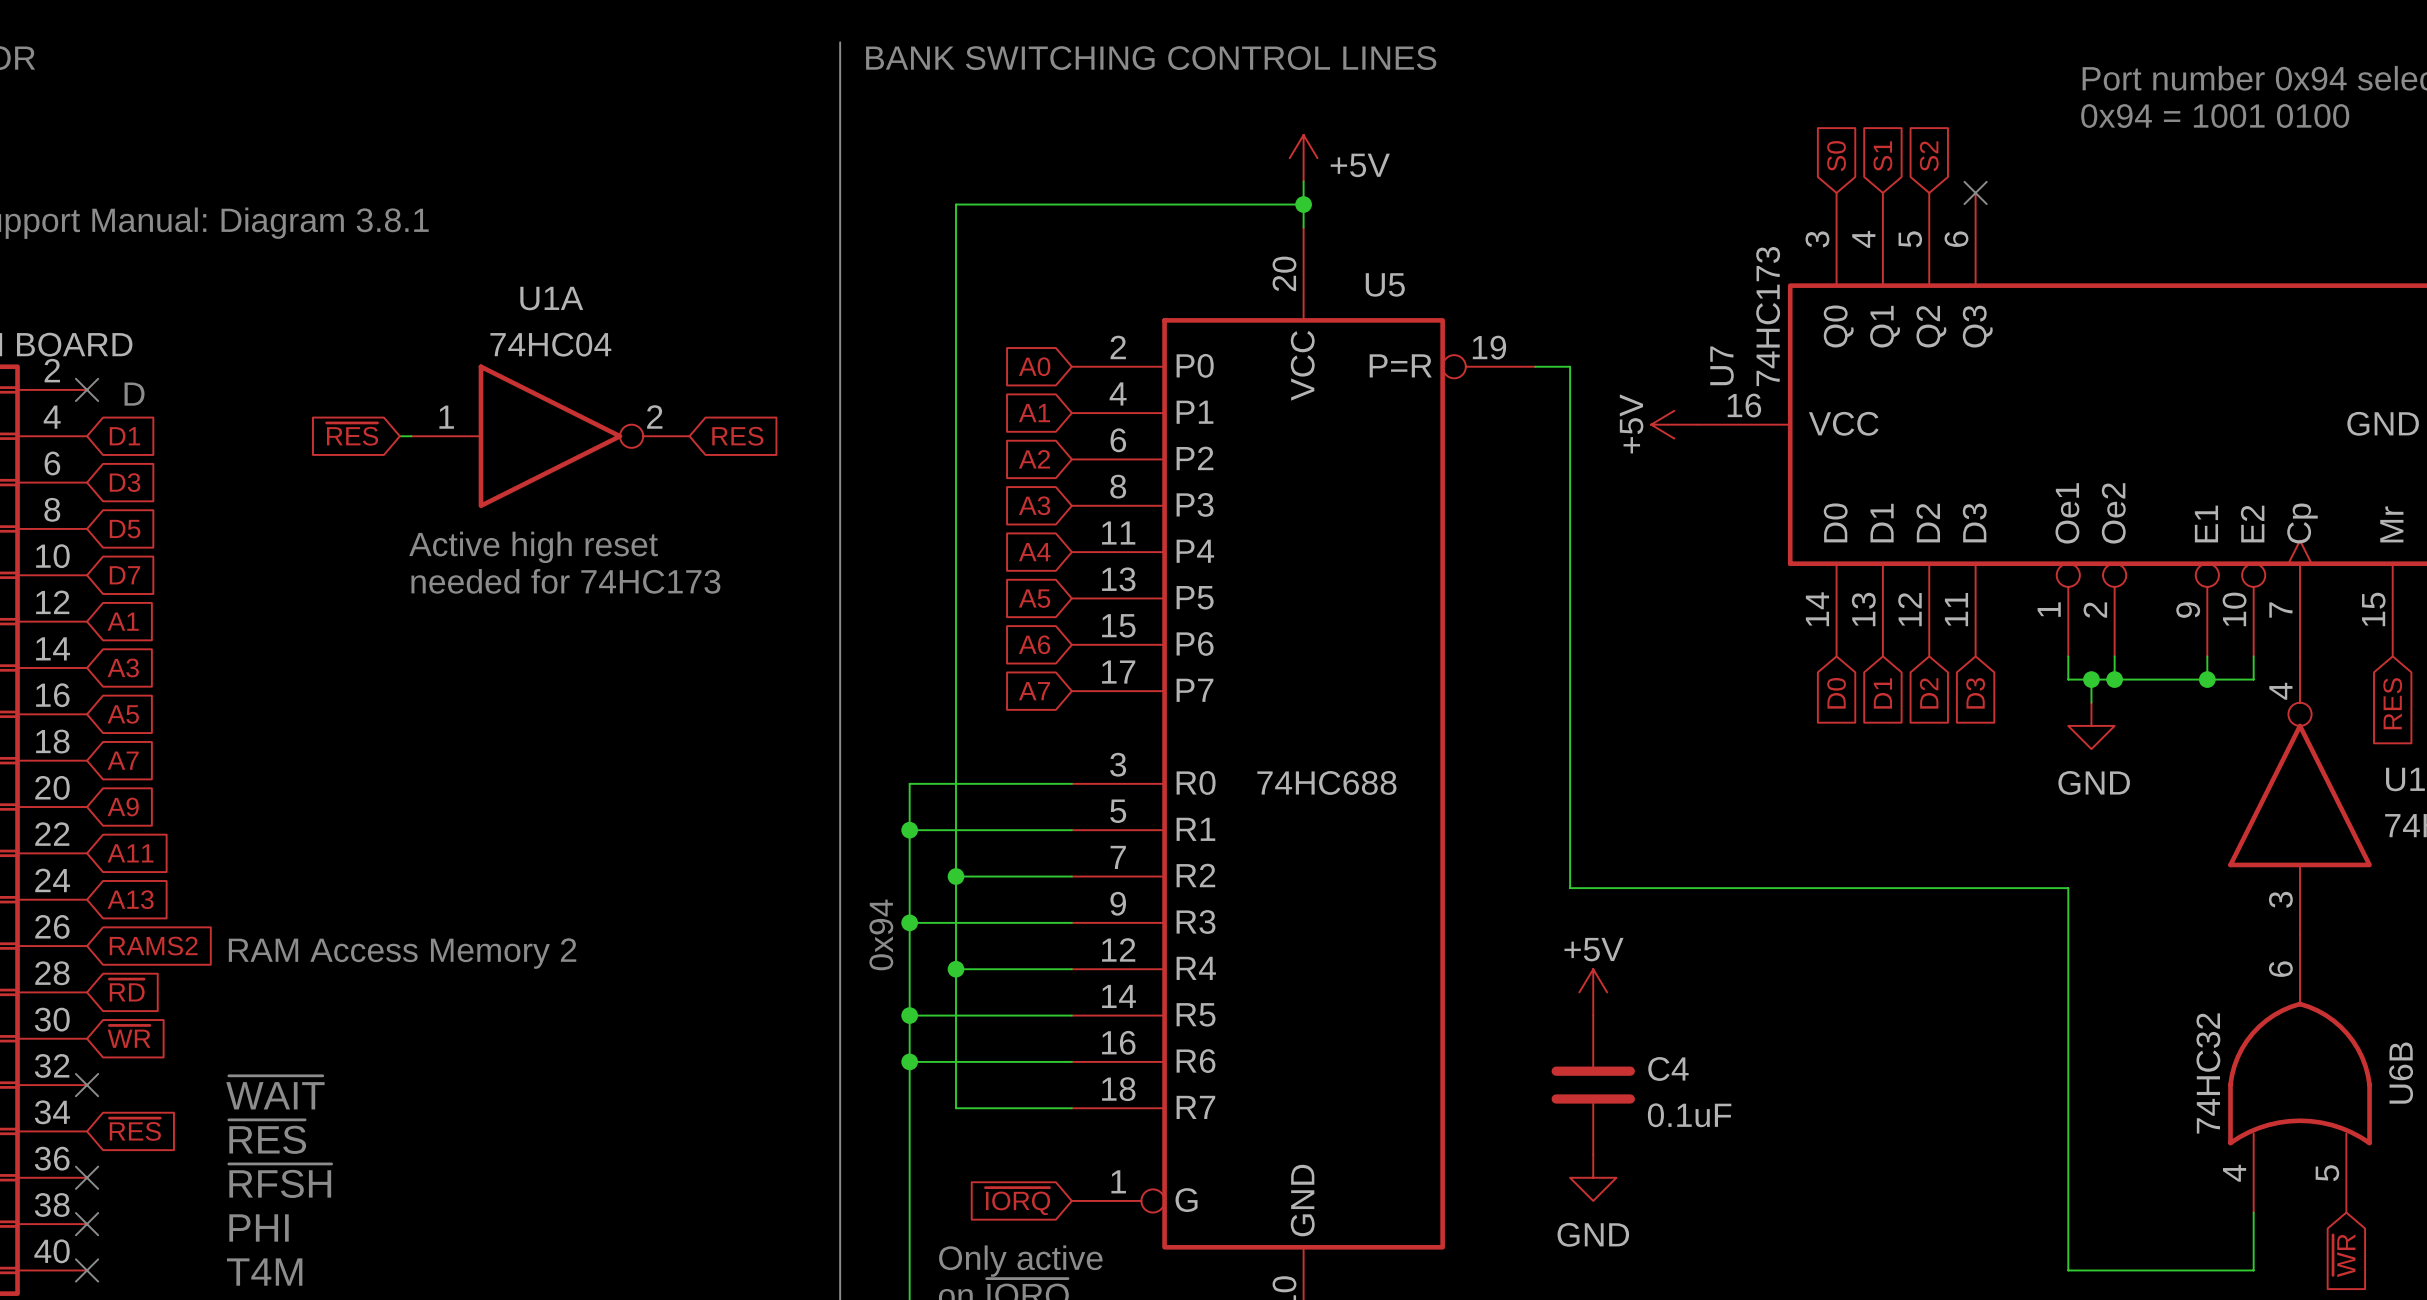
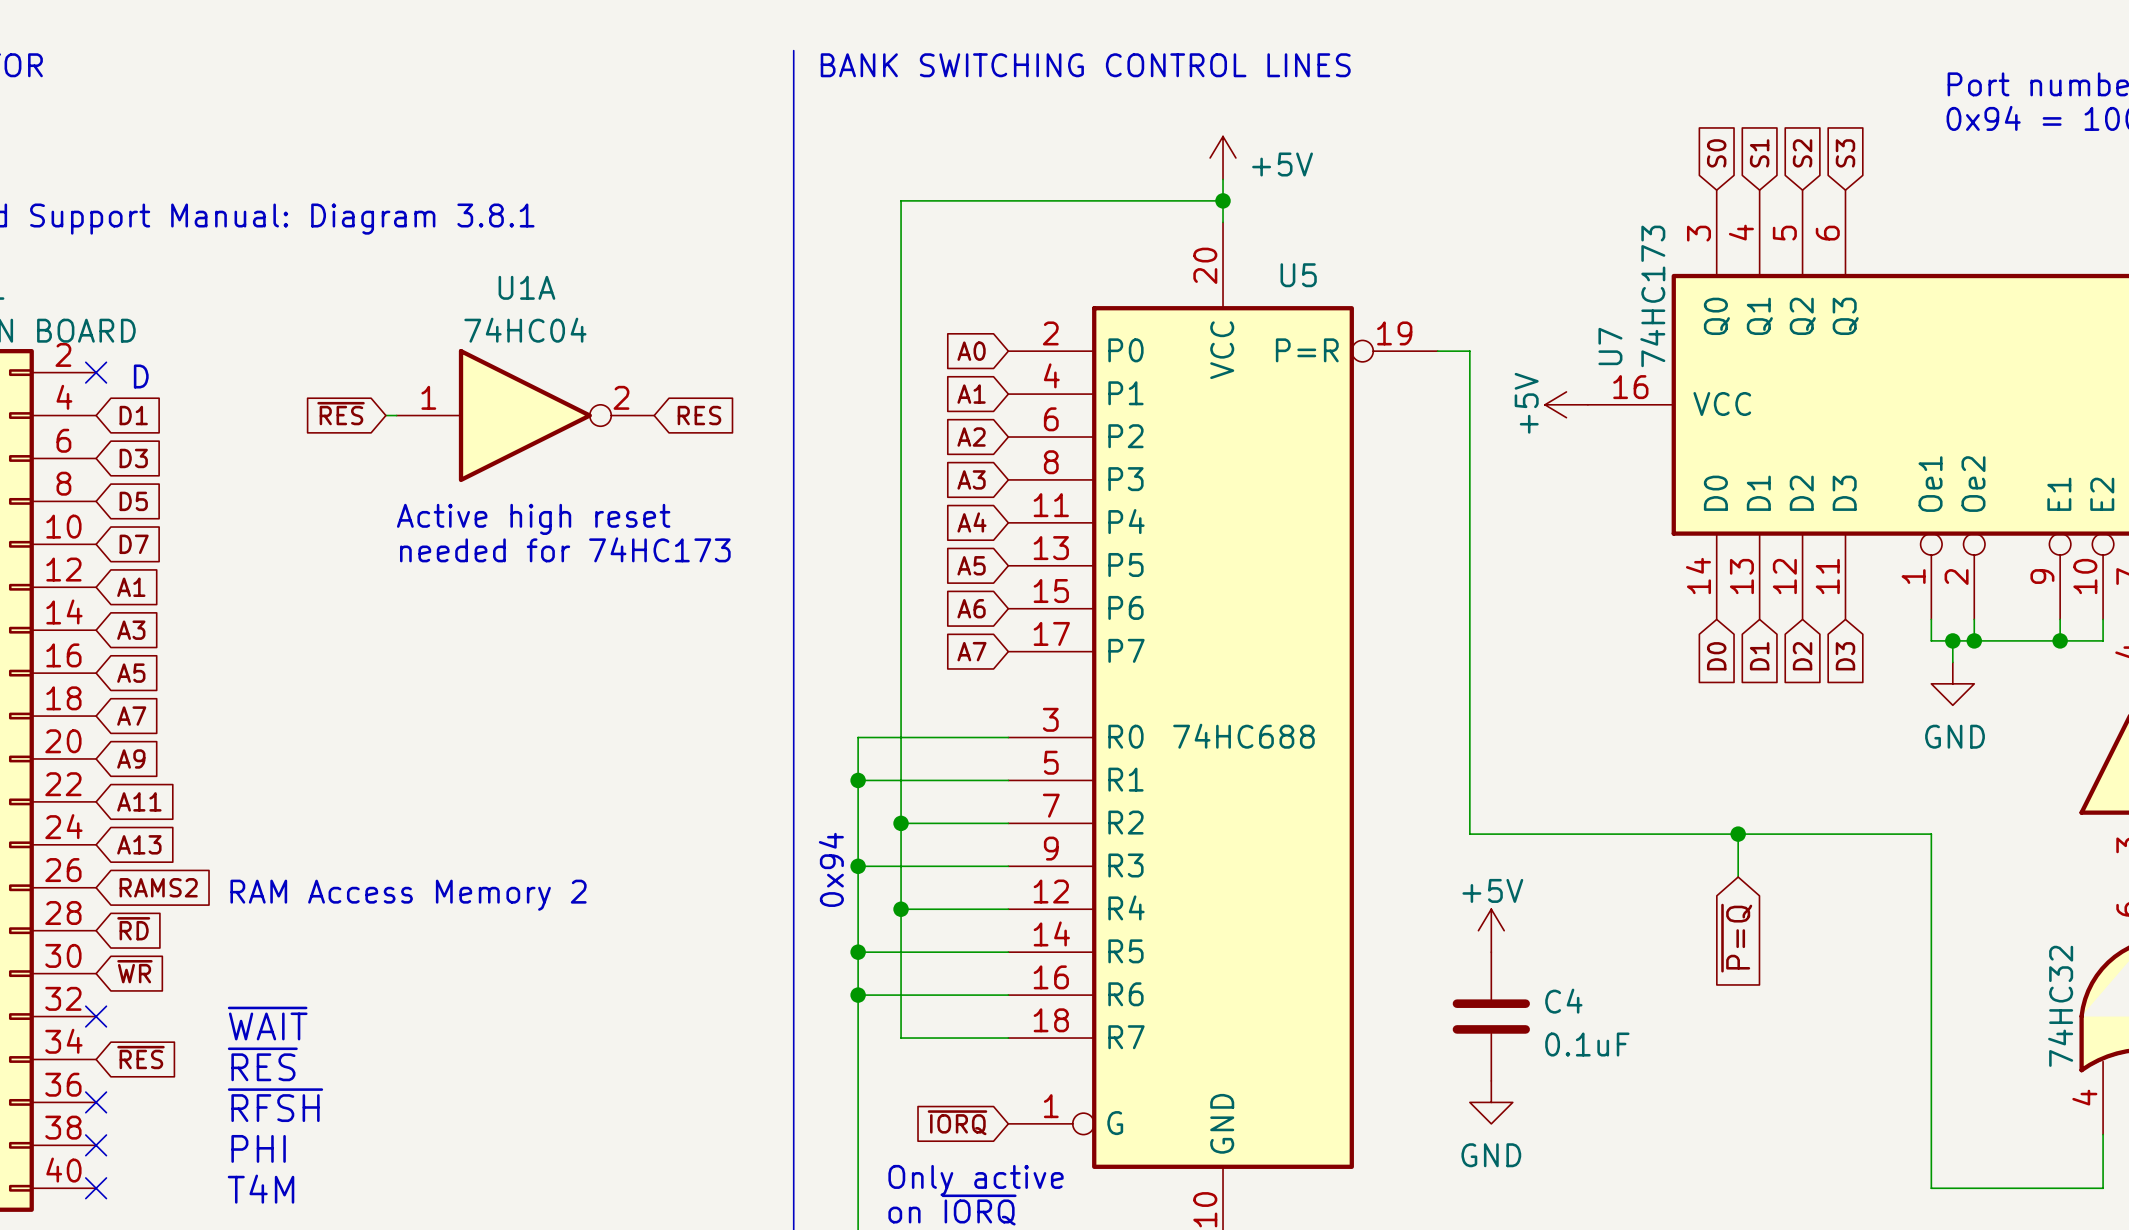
global label: none -> S3 (1845, 153)
no-connect mark: (1975, 192) -> none
wire: none -> (1738, 834) (1738, 877)
junction: none -> (1738, 834)
global label: none -> ~{P=Q} (1736, 938)

